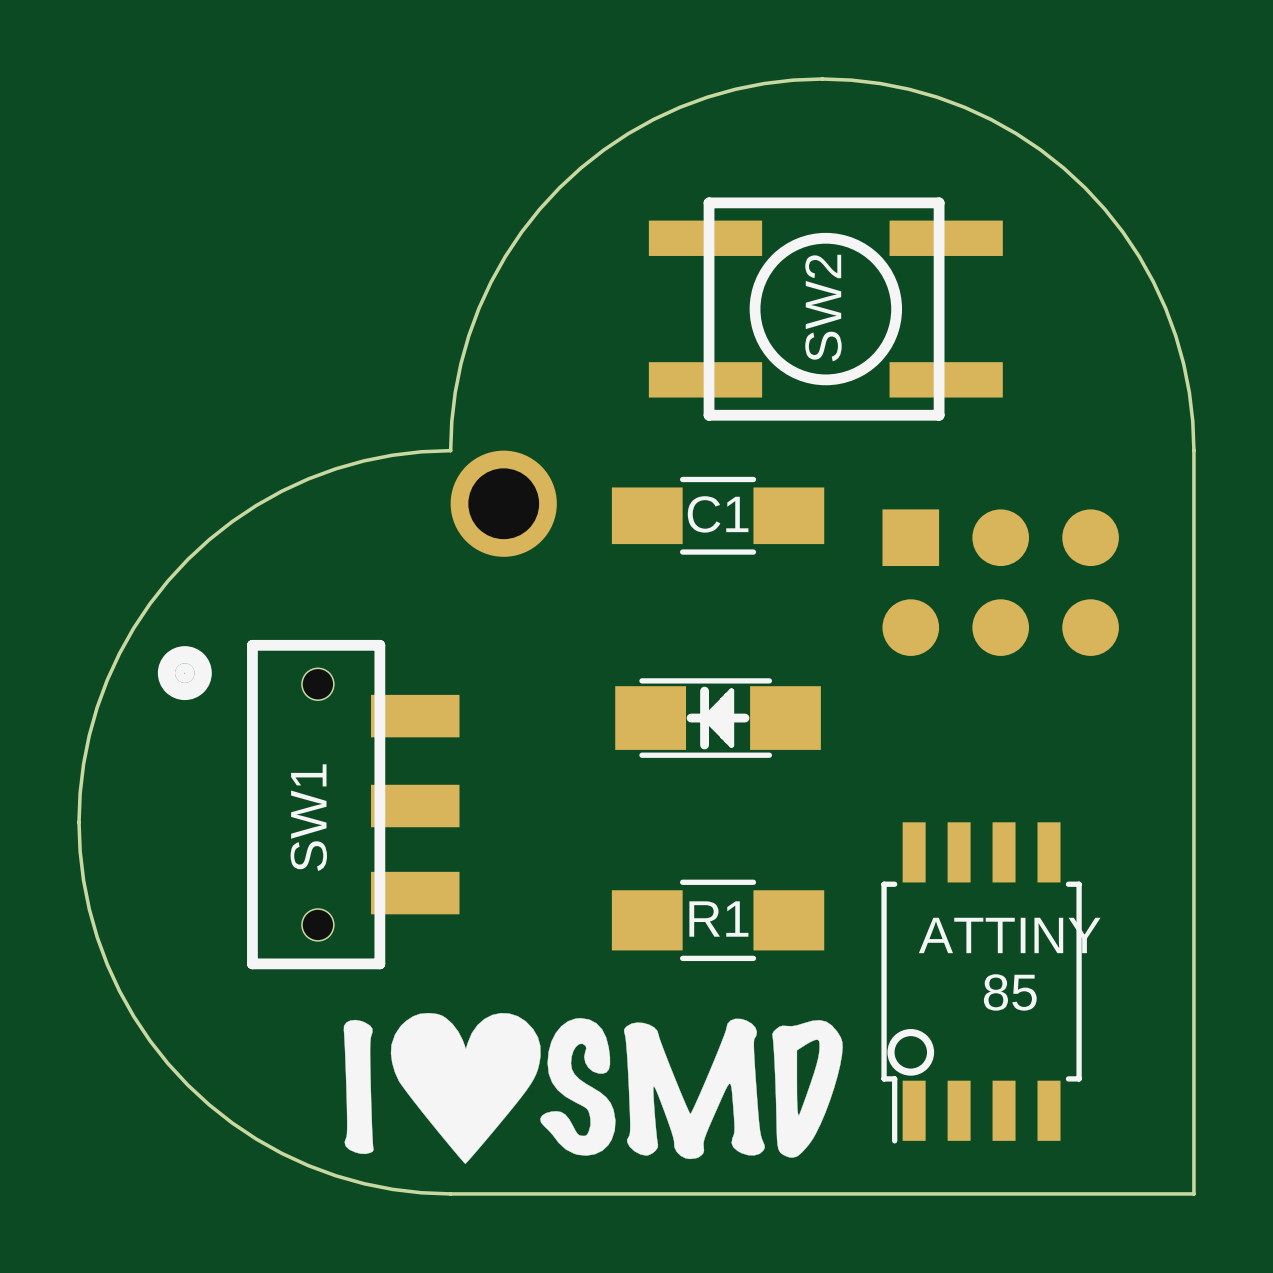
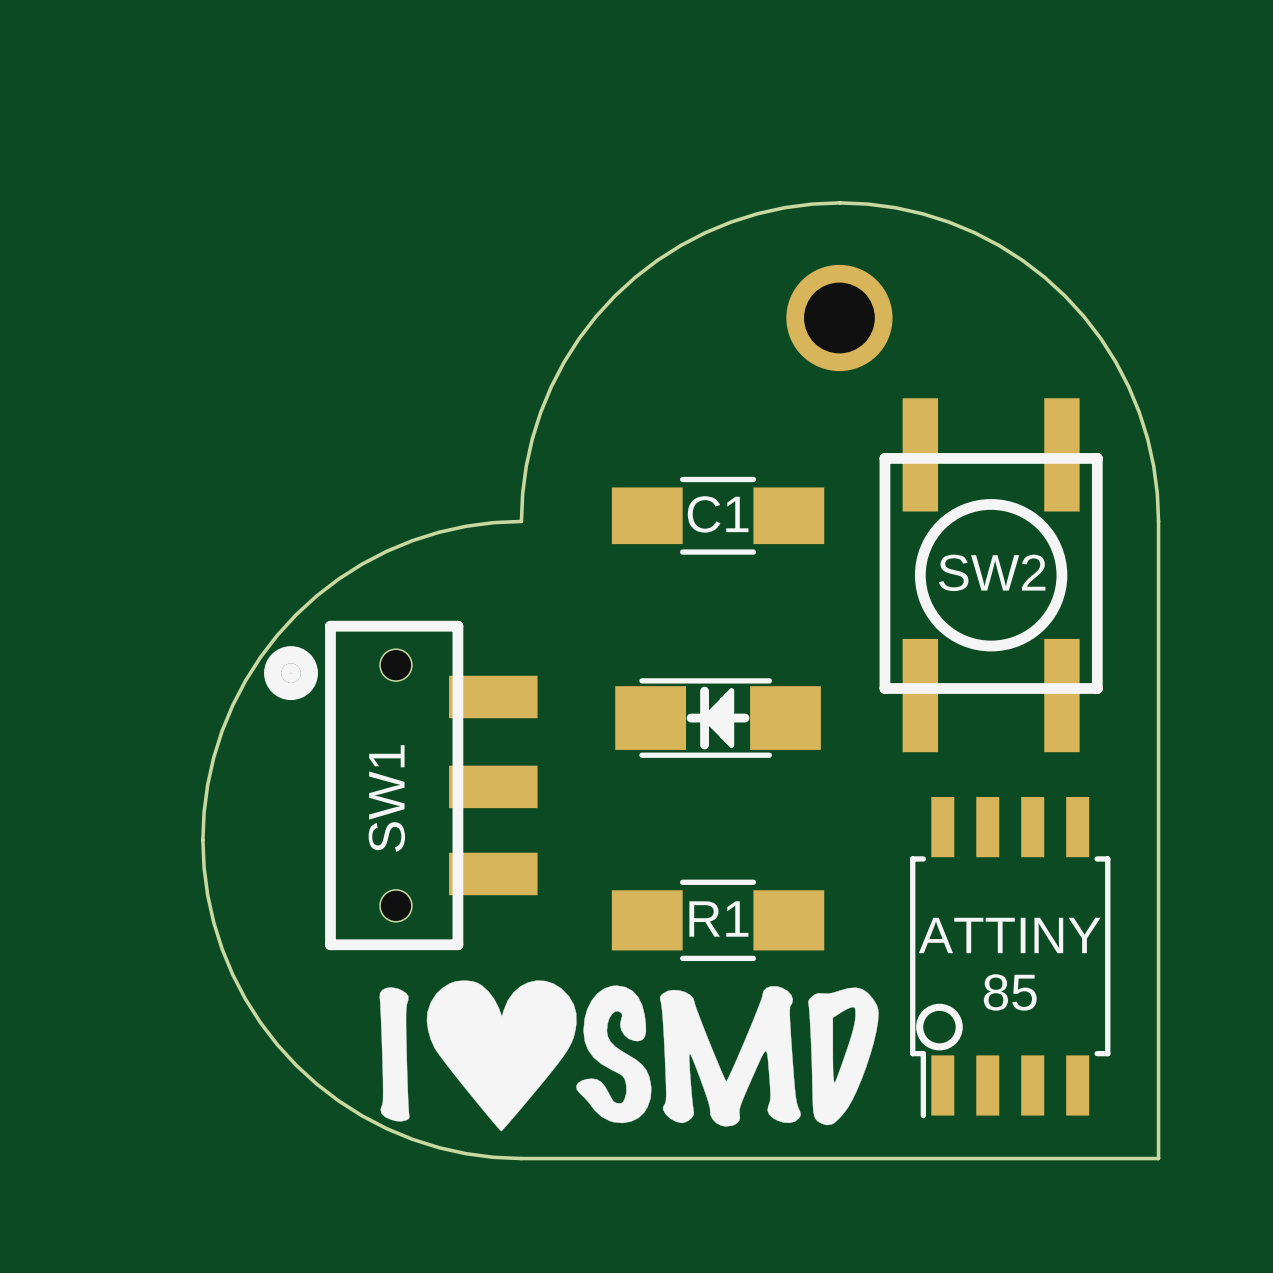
board edge: (822, 78) (764, 83) (707, 97) (653, 119) (603, 149) (580, 168) (559, 187) (521, 232) (505, 256) (478, 308) (460, 363) (455, 392) (450, 450) (392, 455) (335, 468) (281, 491) (256, 505) (232, 521) (187, 559) (149, 603) (119, 653) (107, 680) (89, 735) (80, 793) (78, 822) (83, 880) (97, 937) (107, 964) (133, 1016) (168, 1063) (209, 1104) (232, 1122) (281, 1153) (335, 1175) (363, 1183) (421, 1192) (1193, 1193) (1193, 450) (1189, 392) (1175, 335) (1153, 281) (1122, 232) (1085, 187) (1040, 149) (991, 119) (937, 97) (880, 83) (822, 78) -> (839, 202) (784, 207) (731, 222) (680, 245) (635, 277) (595, 316) (579, 338) (551, 386) (532, 438) (526, 466) (521, 521) (466, 526) (438, 532) (412, 540) (362, 564) (316, 595) (277, 635) (260, 657) (232, 705) (213, 757) (204, 812) (204, 867) (213, 922) (222, 948) (245, 999) (277, 1044) (316, 1084) (362, 1115) (386, 1128) (438, 1147) (466, 1153) (521, 1158) (1158, 1158) (1158, 521) (1153, 466) (1139, 412) (1128, 386) (1100, 338) (1065, 296) (1022, 260) (974, 232) (922, 213) (895, 207) (839, 202)
SW2 rotation: 0° (825, 309) -> 90° clockwise (991, 575)
SW2 position: (825, 309) -> (991, 575)
part position: (503, 503) -> (839, 317)
part: (1000, 582) -> none
drawing position: (184, 673) -> (291, 673)
drawing position: (184, 673) -> (291, 673)
drawing position: (184, 673) -> (291, 673)
SW1 position: (353, 804) -> (431, 785)
part position: (981, 982) -> (1010, 957)
drawing position: (593, 1088) -> (629, 1055)

